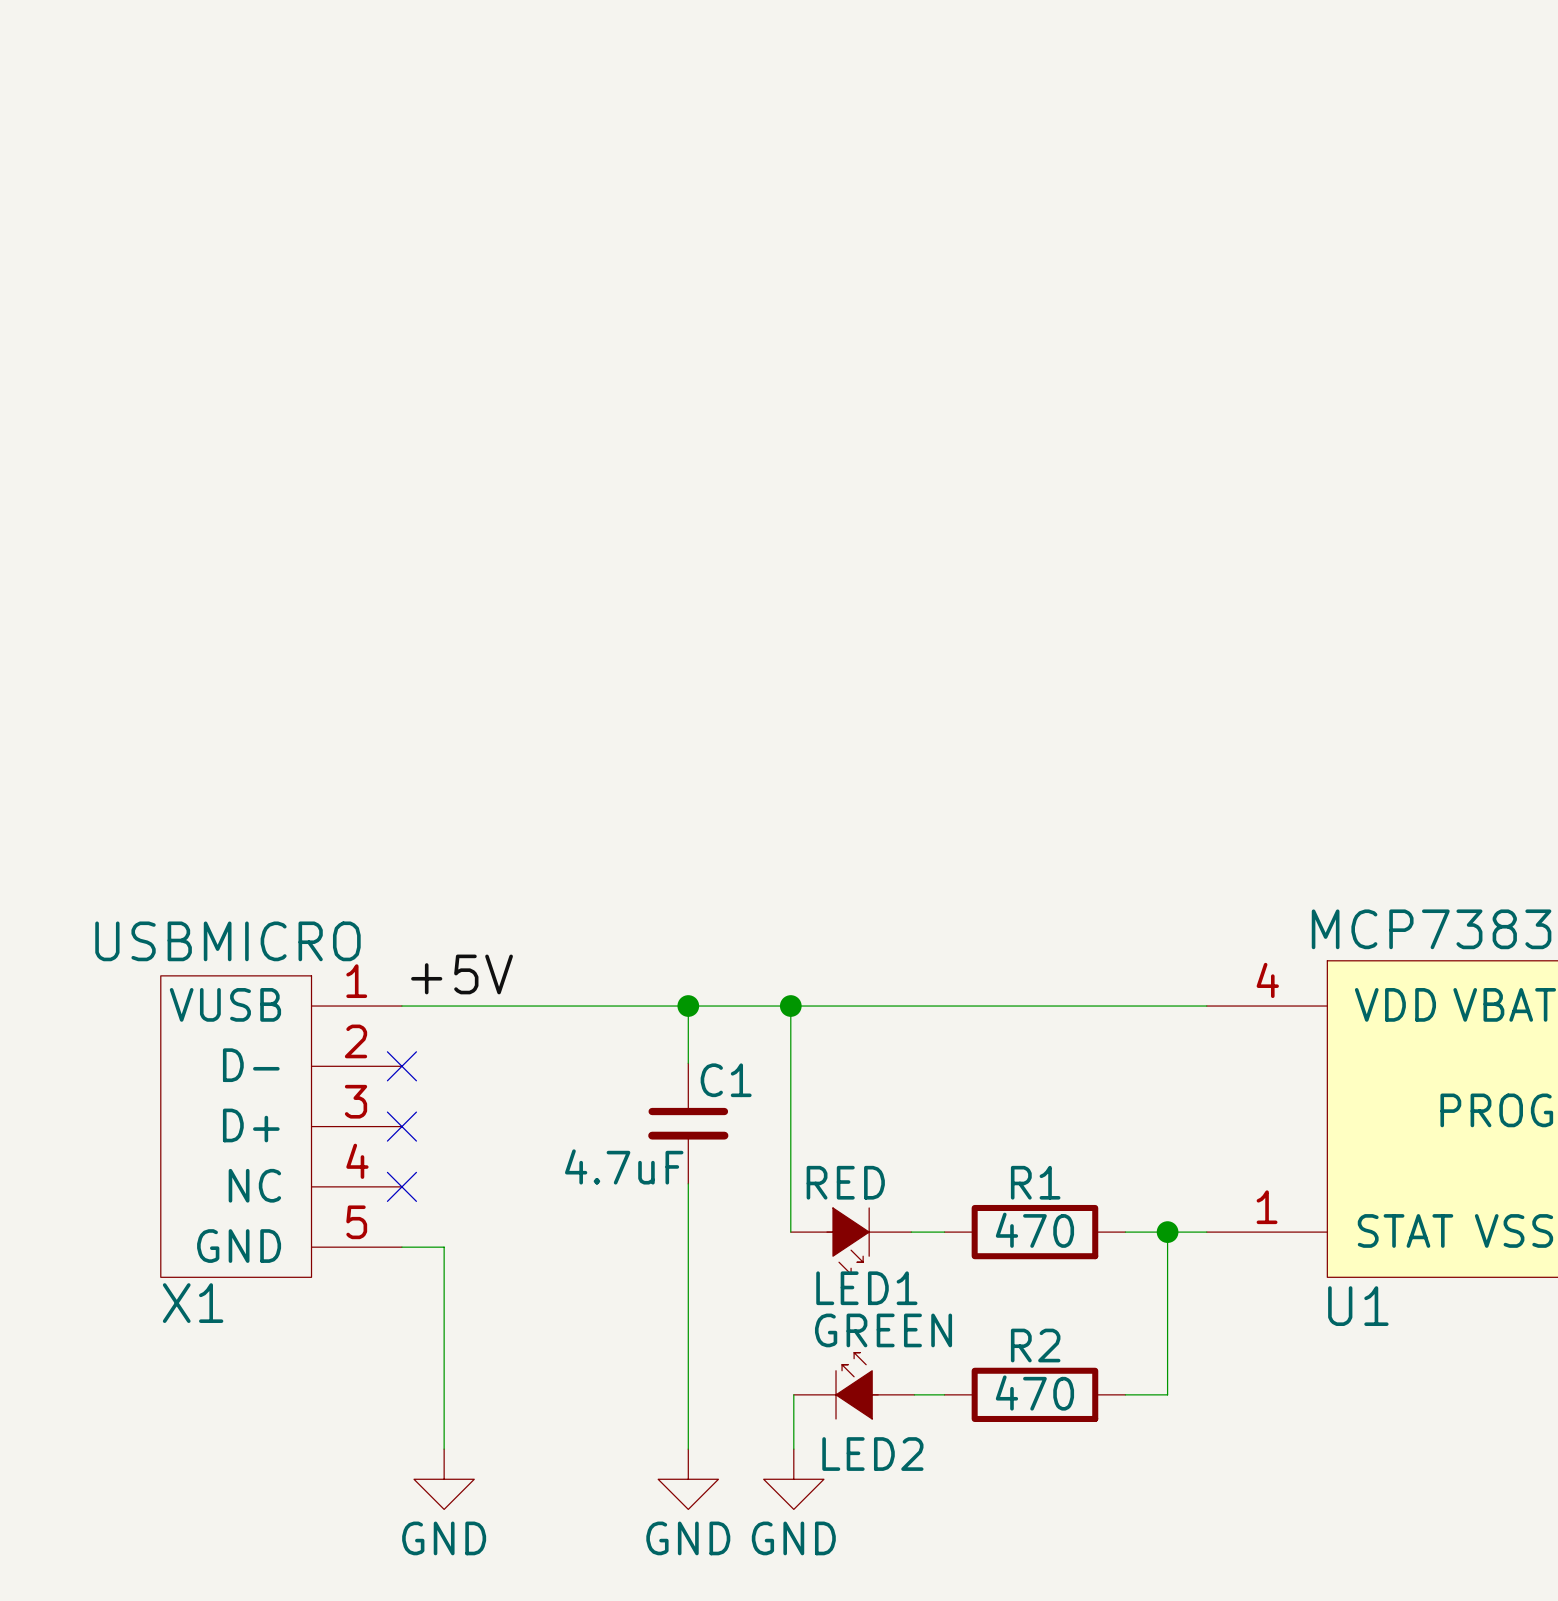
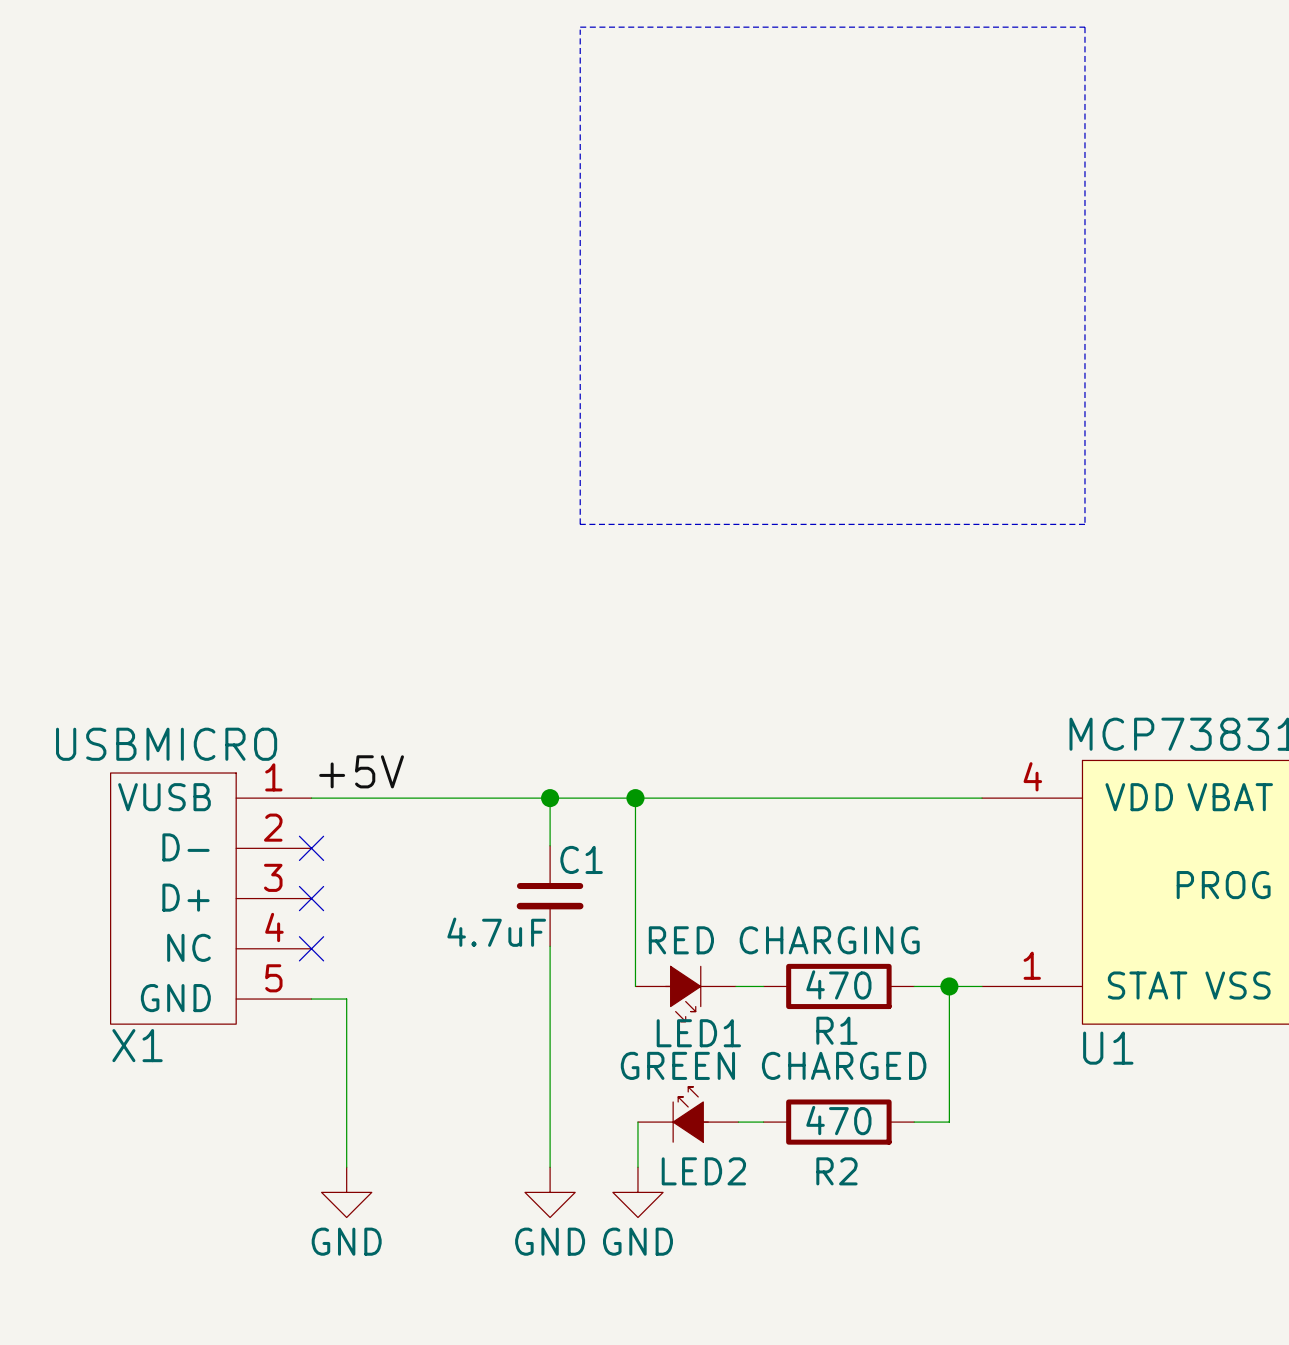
line: none -> (580, 27) (1084, 27) (1084, 524) (580, 524) (580, 29)
LED1 value: RED (845, 1182) -> RED CHARGING (784, 940)
R1 name position: R1 (1035, 1182) -> R1 (836, 1030)
LED2 value: GREEN (883, 1330) -> GREEN CHARGED (773, 1065)
R2 name position: R2 (1035, 1345) -> R2 (836, 1171)

